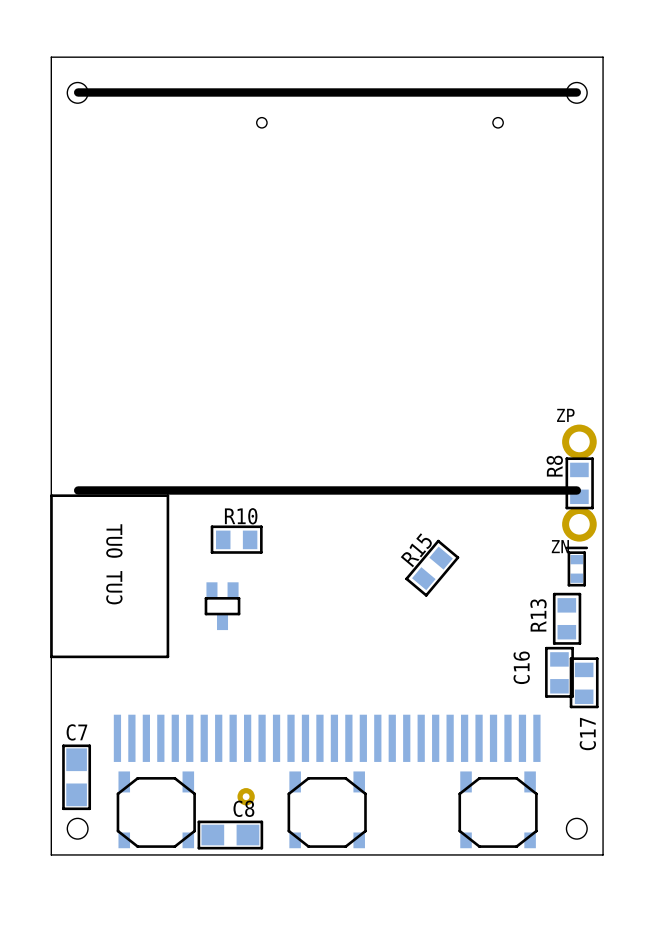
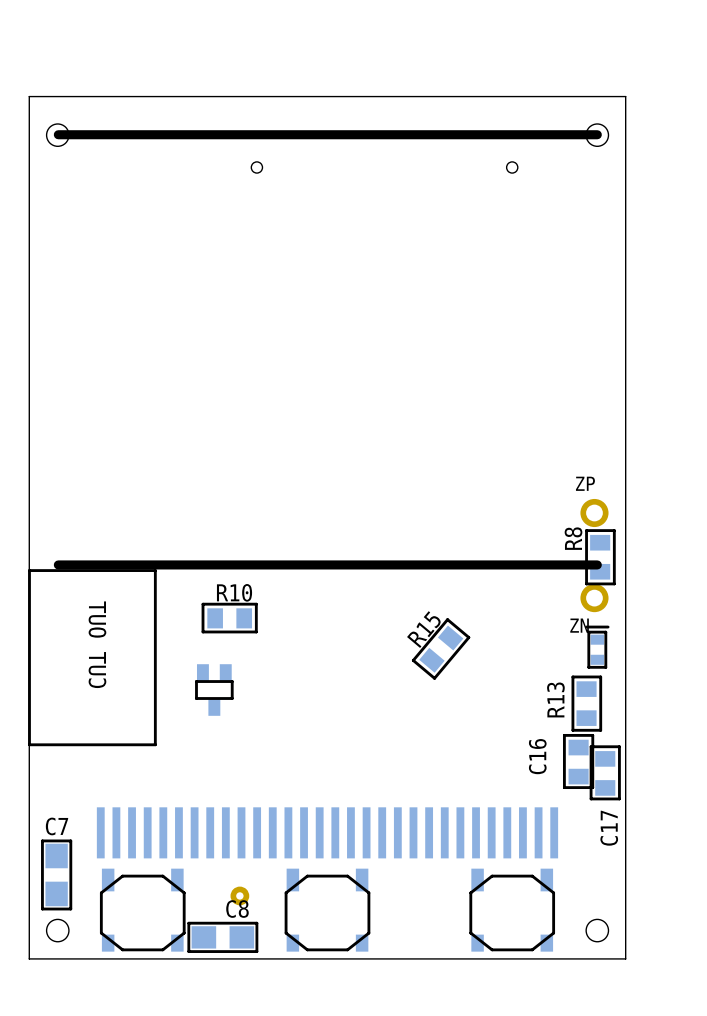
part footprint: [562, 424, 597, 460] -> [580, 498, 609, 528]
part footprint: [562, 506, 597, 542] -> [580, 584, 609, 613]

